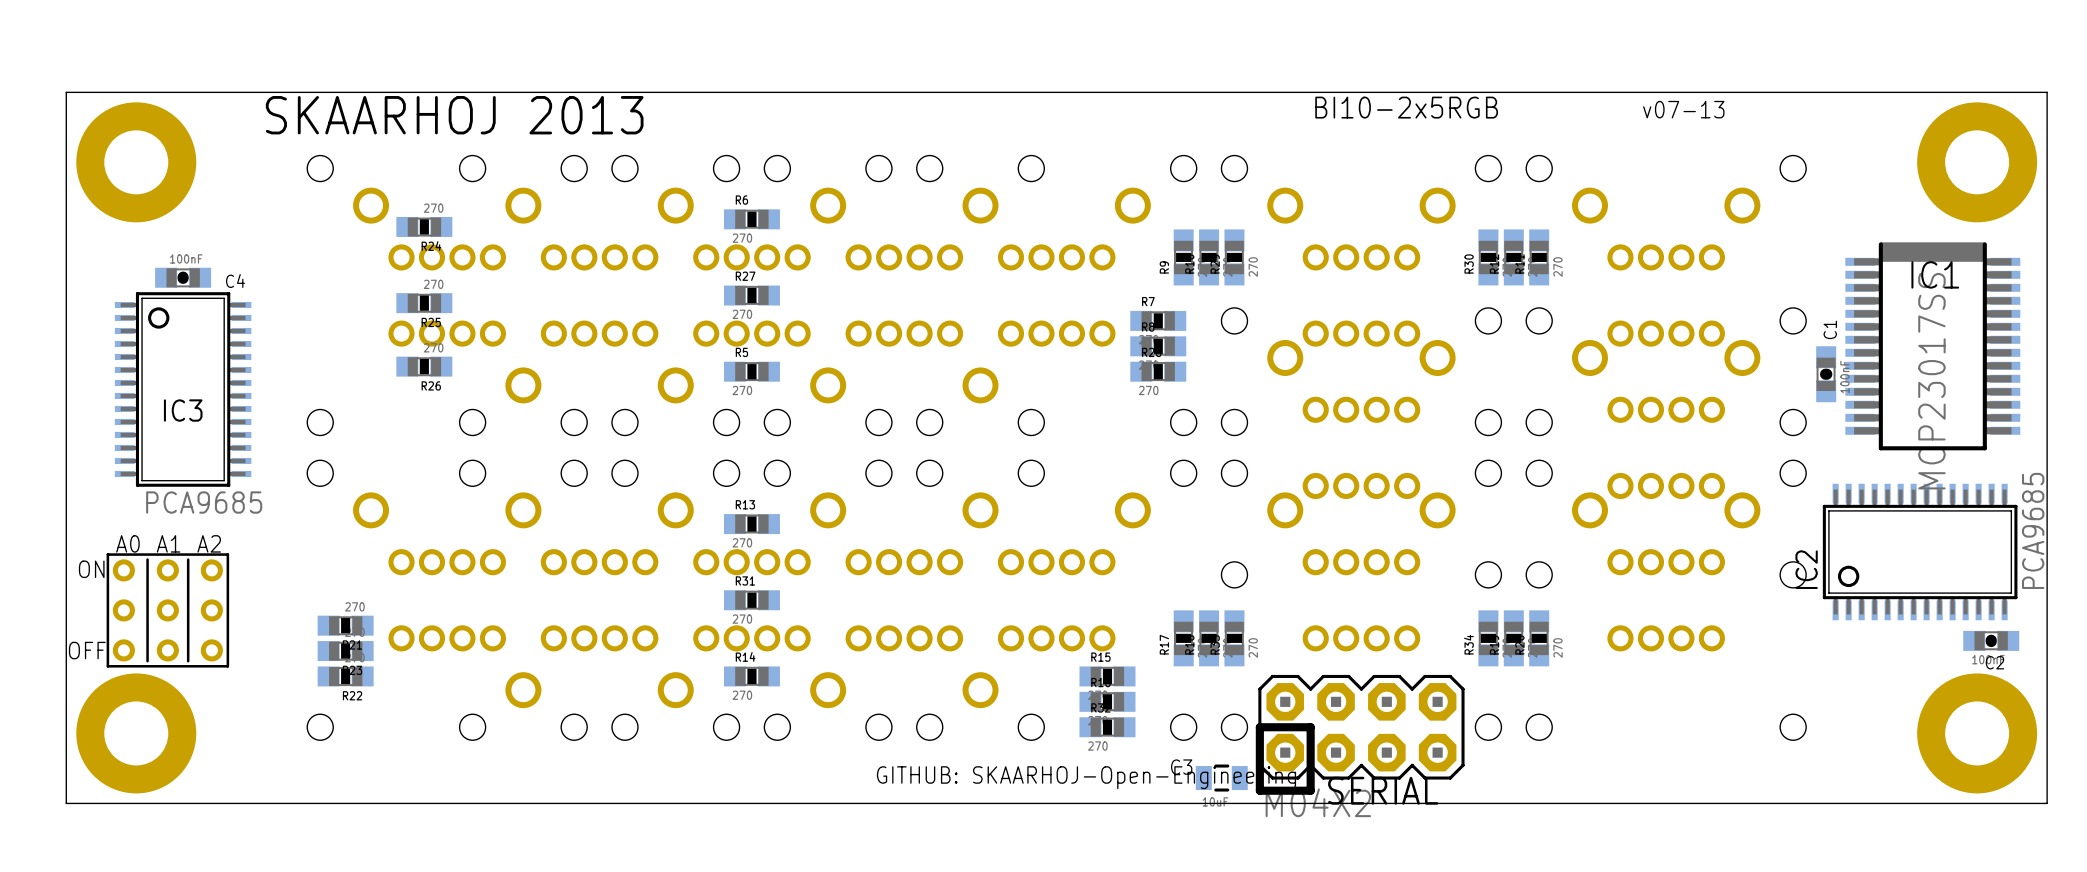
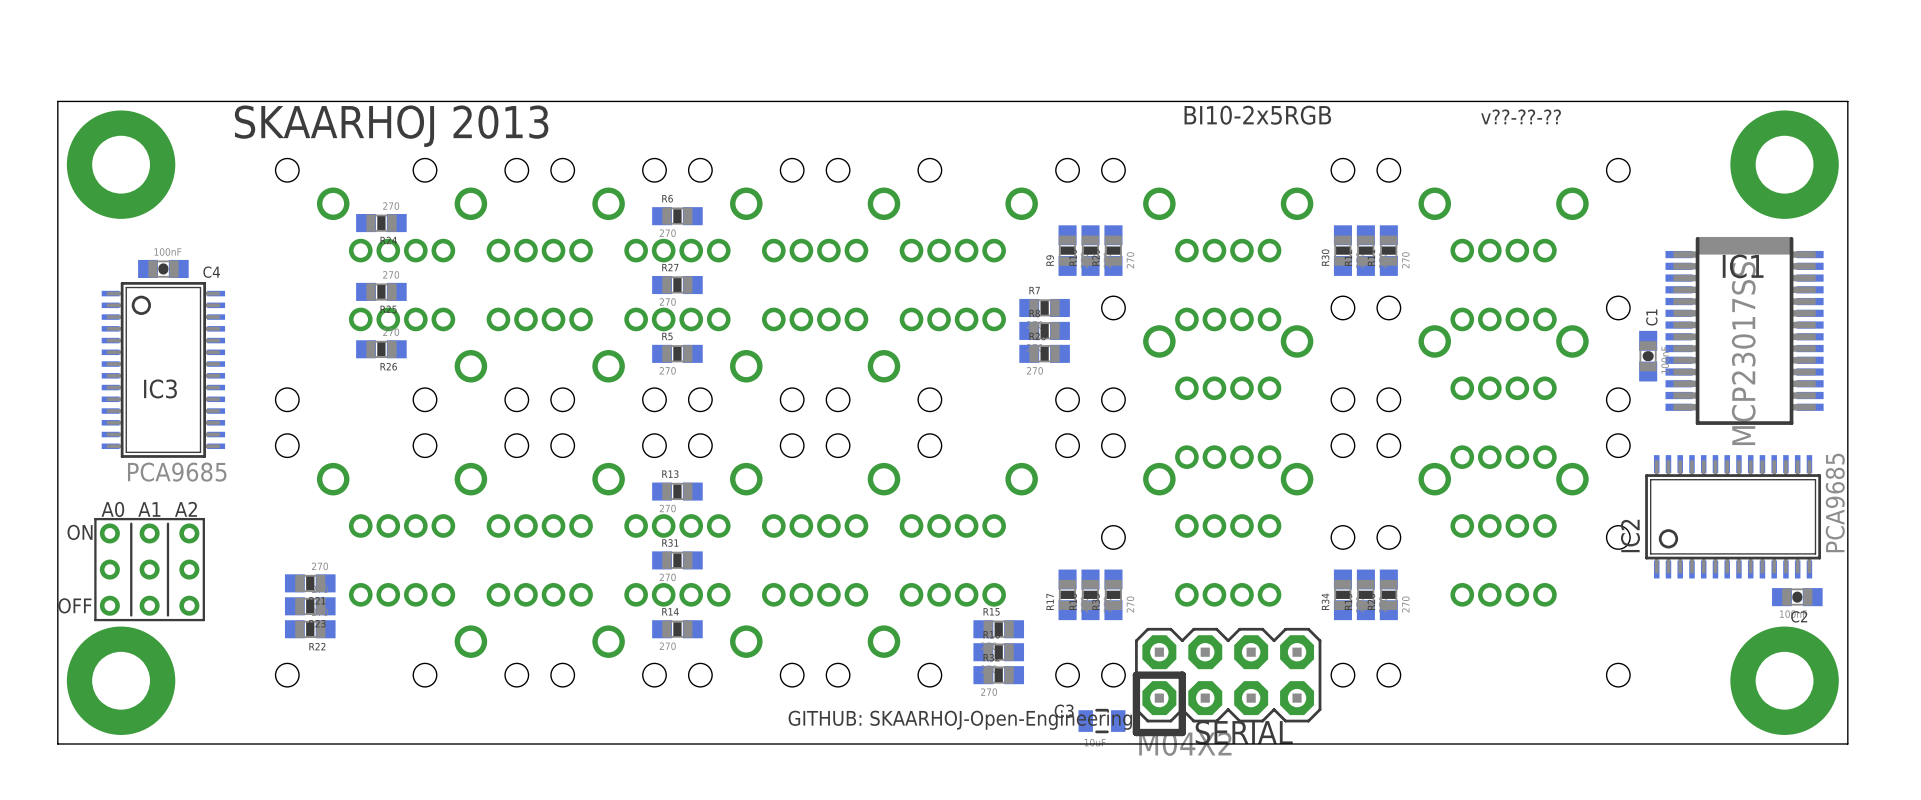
text: v07-13 (1683, 109) -> v??-??-?? (1521, 116)

